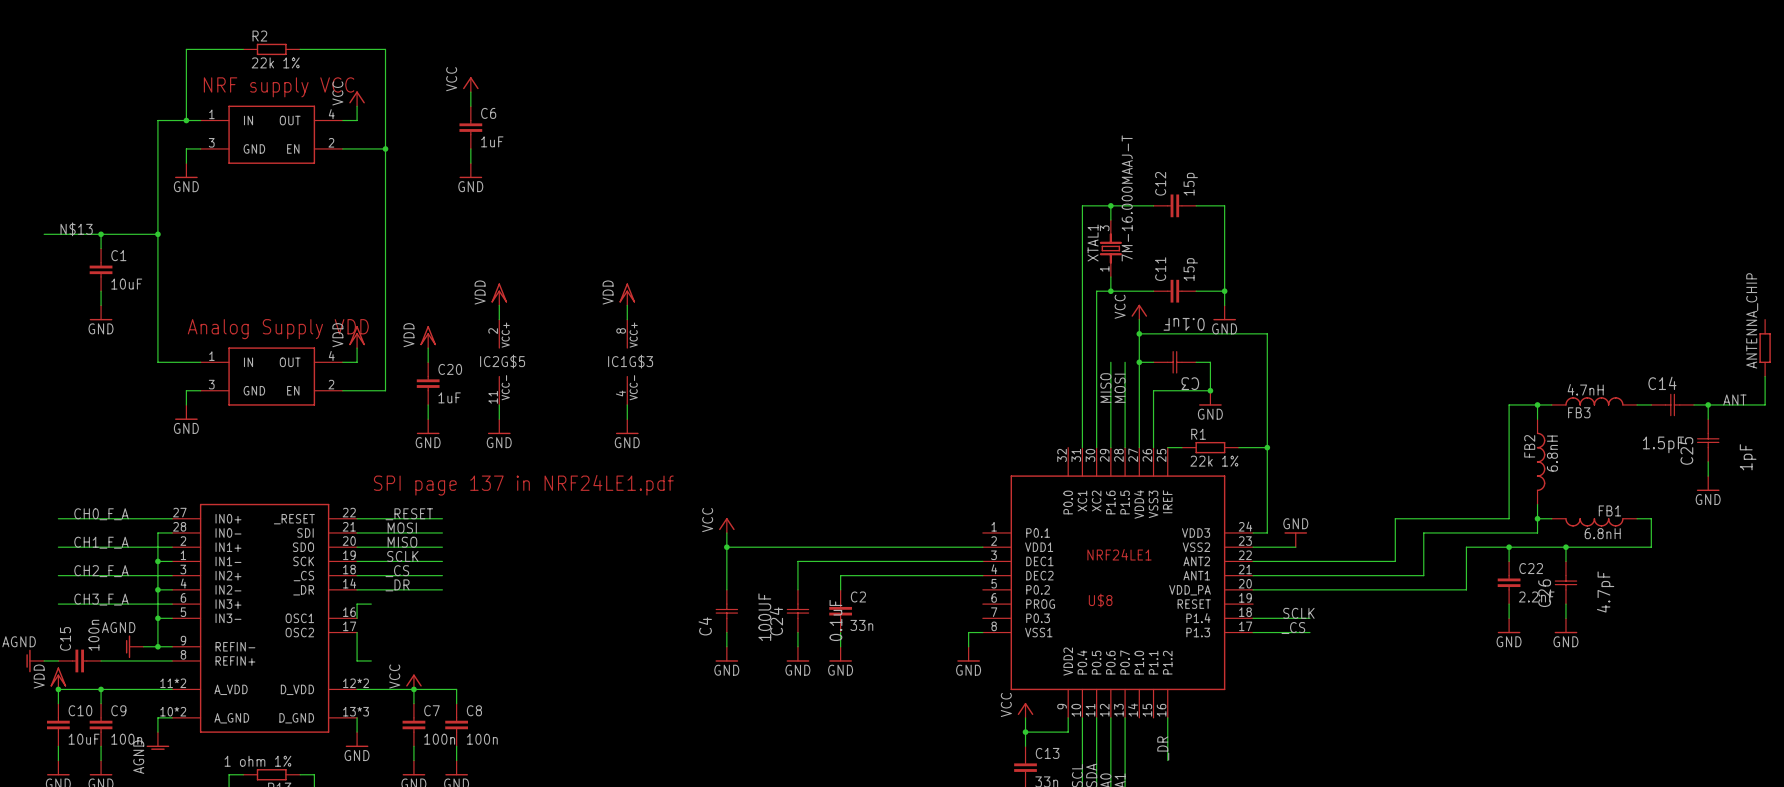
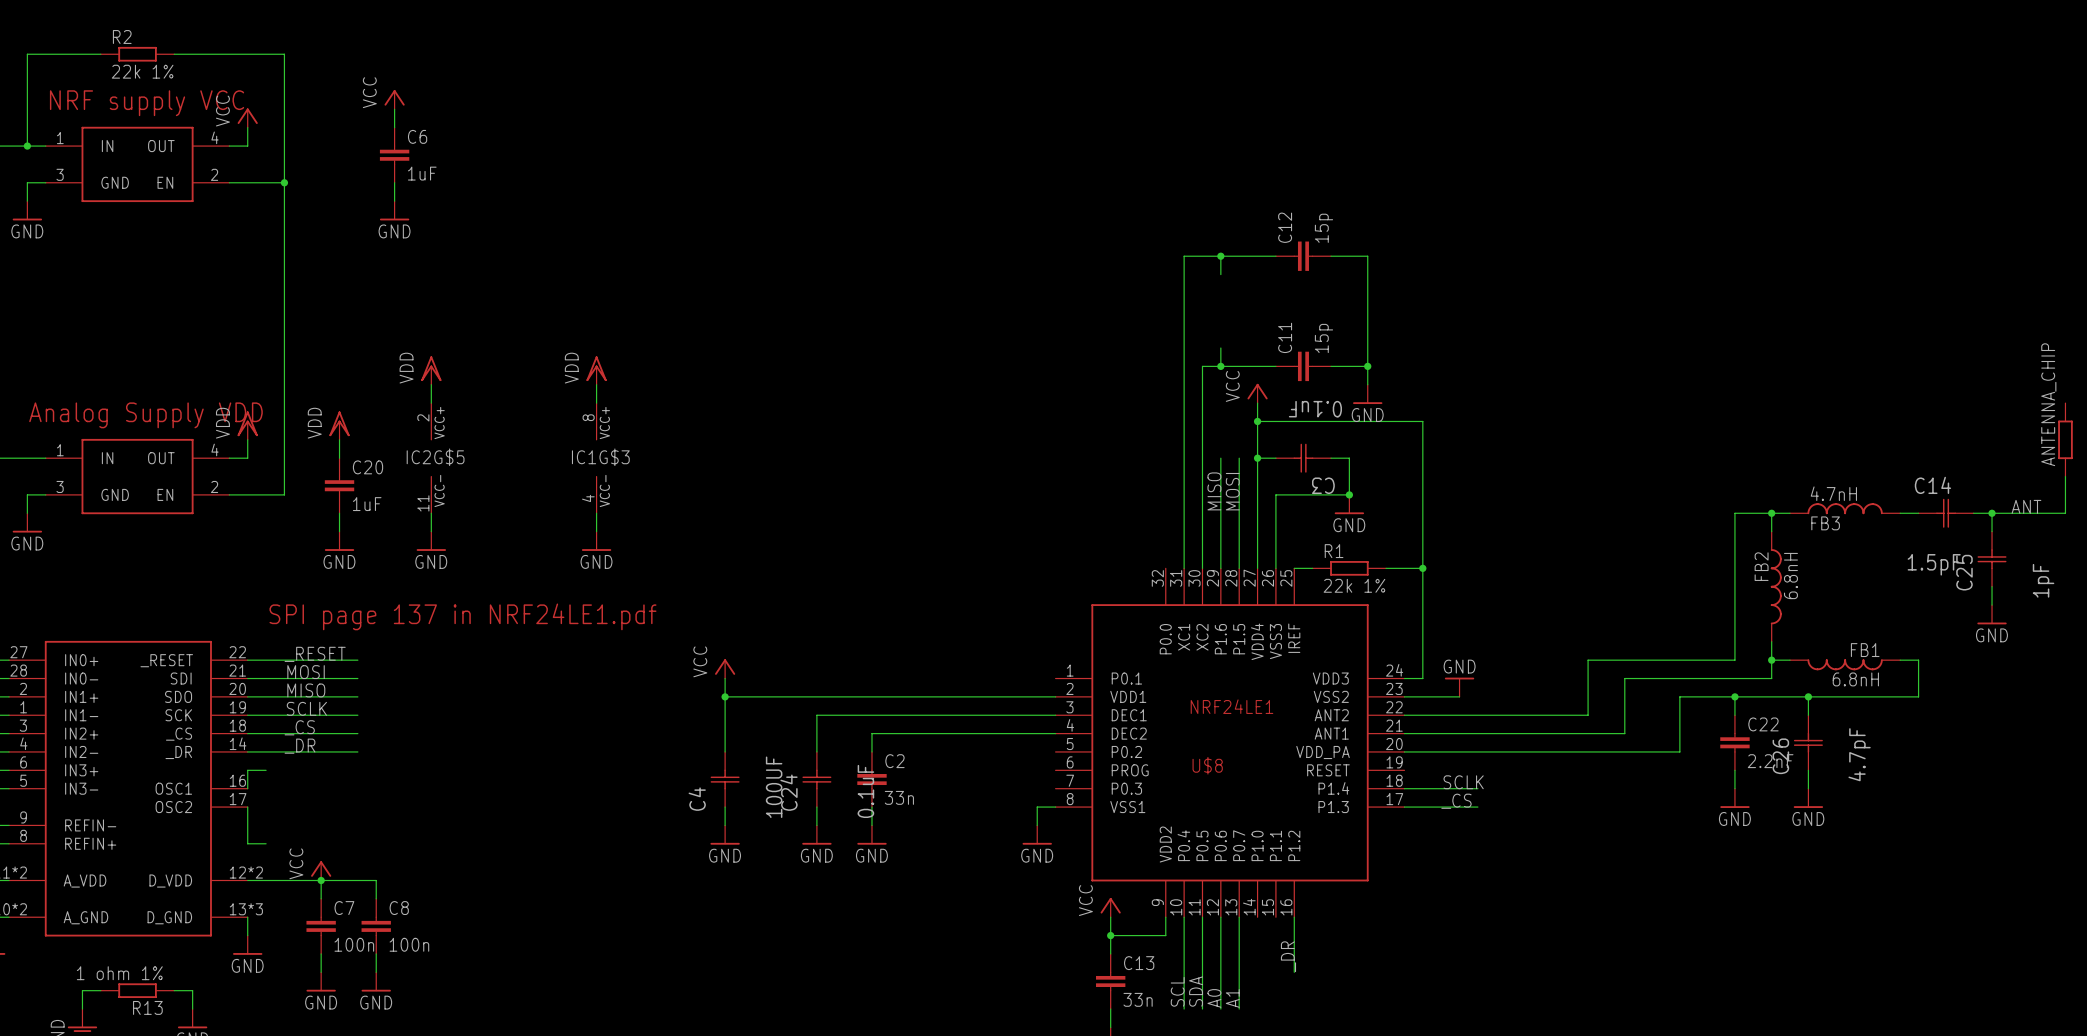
XTAL1: 7M-16.000MAAJ-T (1110, 248) -> none

